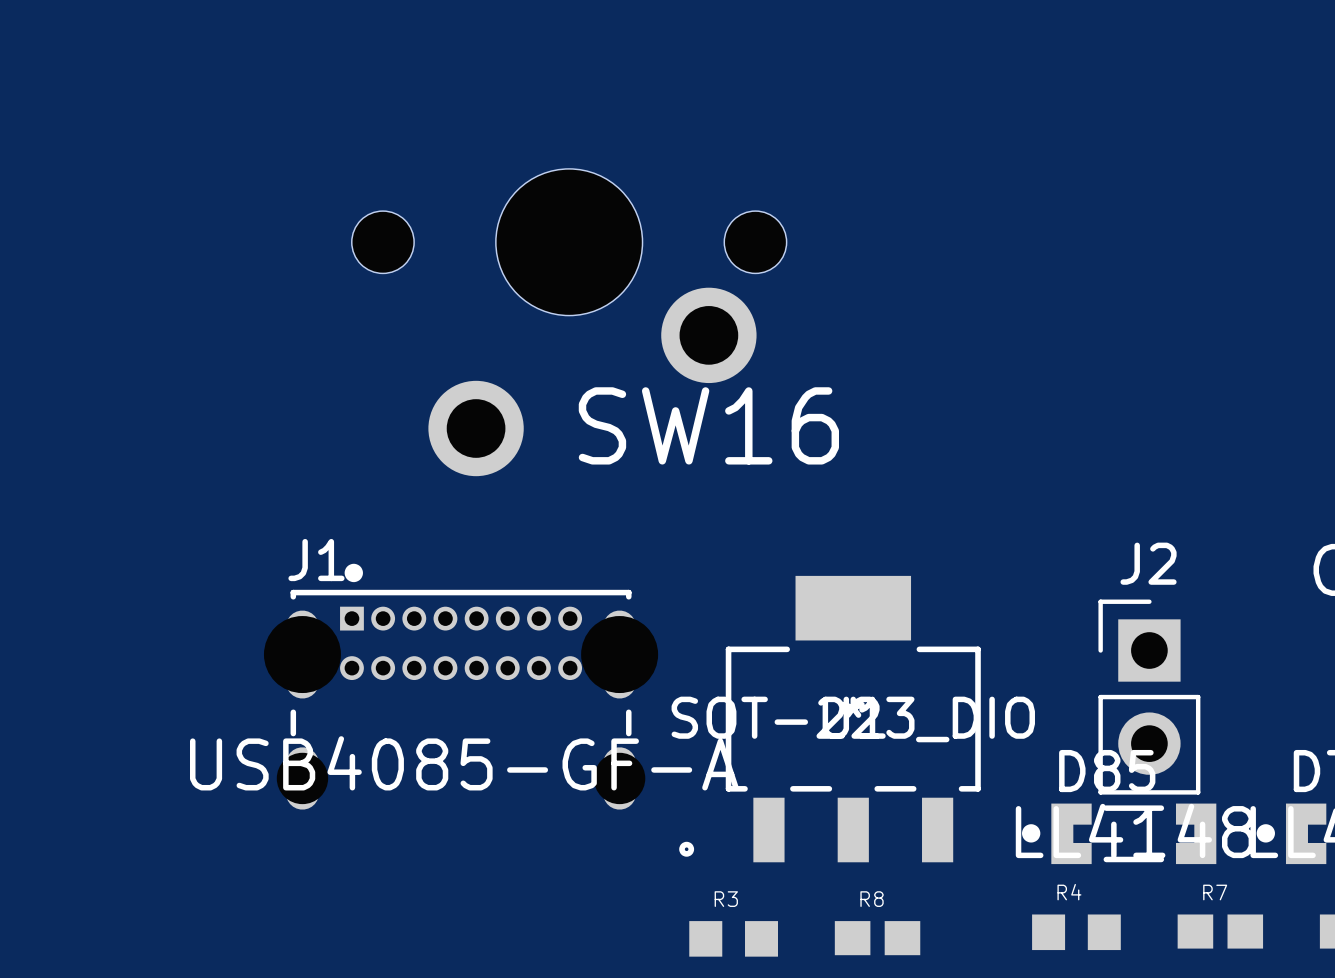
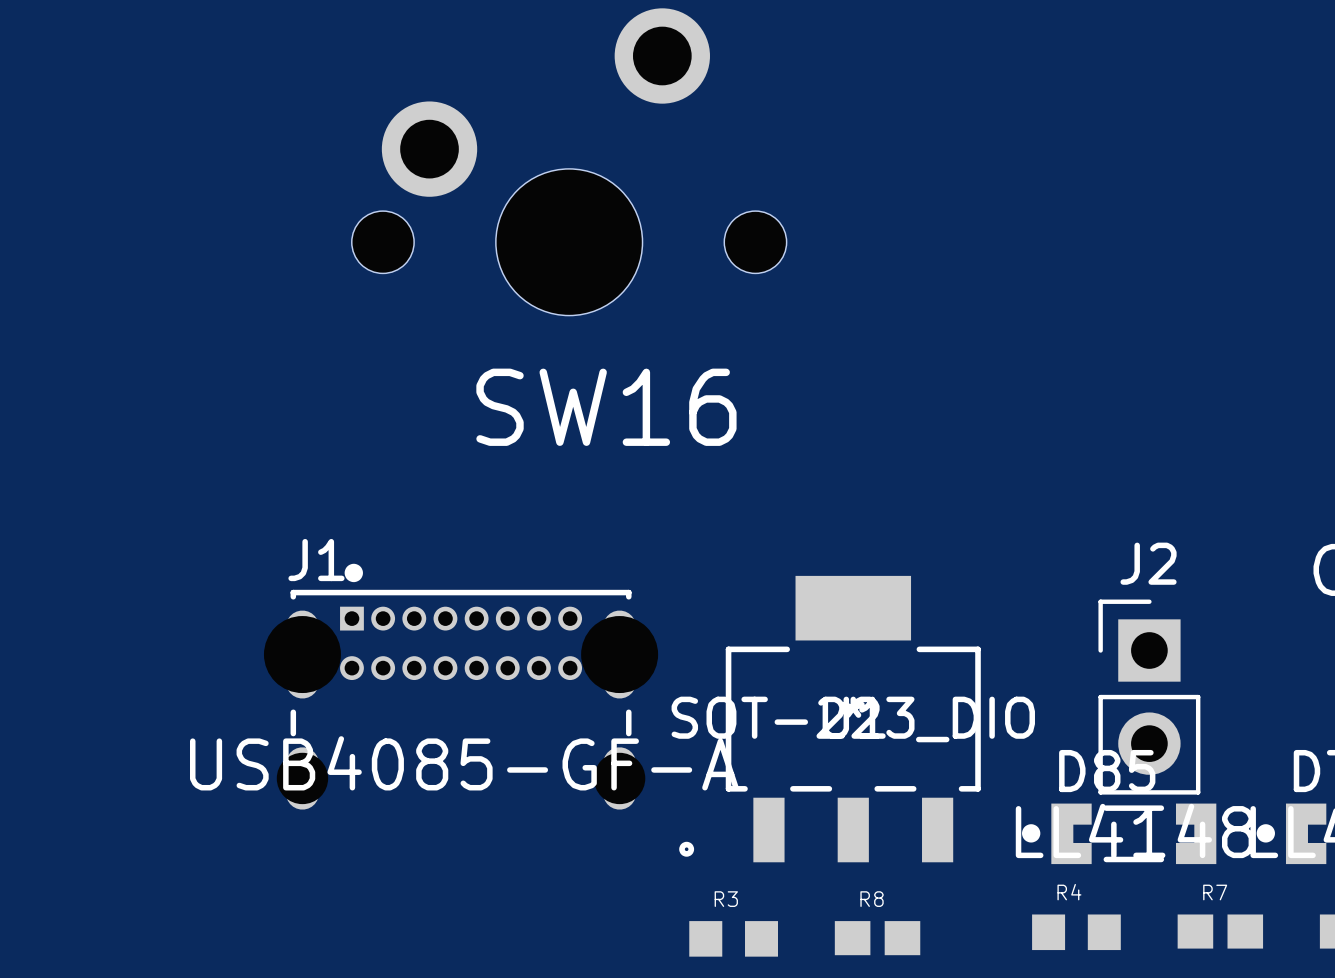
SW16 rotation: 0° (569, 322) -> 180° (569, 161)
SW16 name position: SW16 (708, 425) -> SW16 (606, 407)

